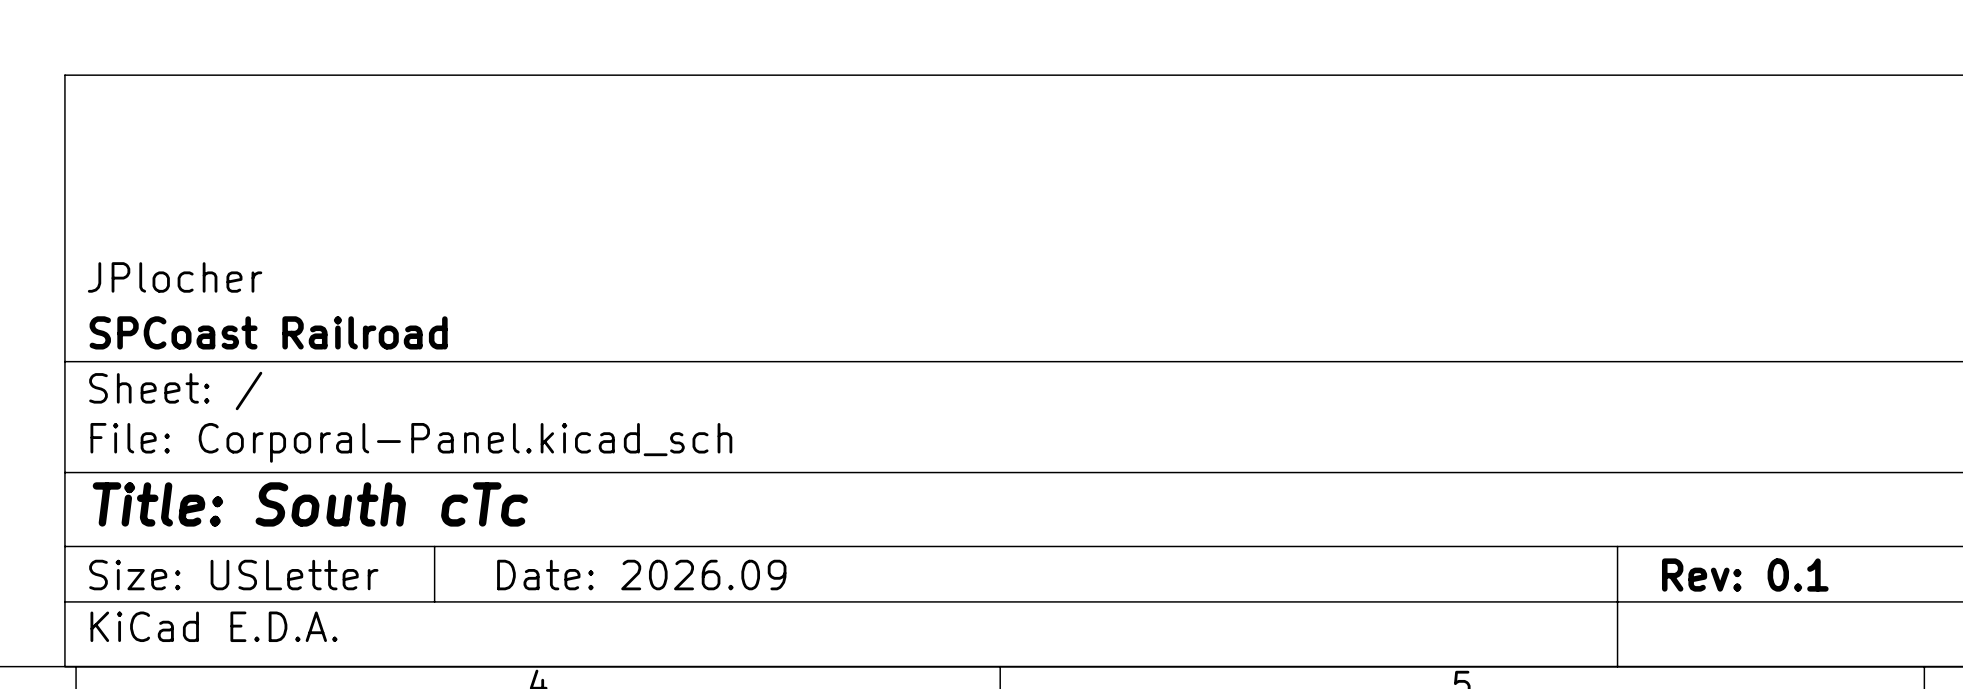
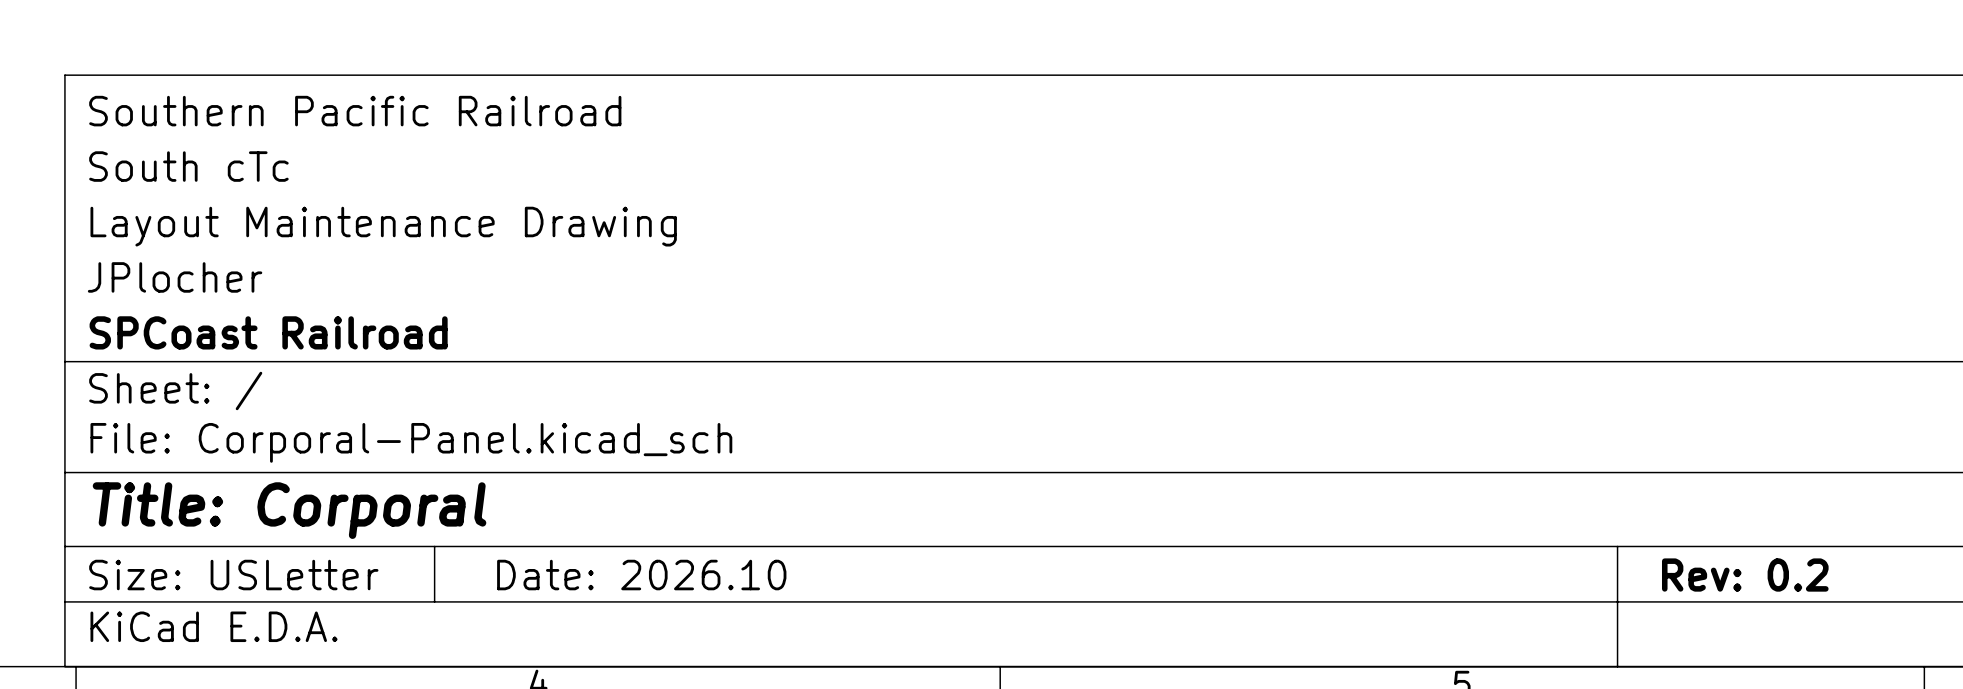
title block: none -> Southern Pacific Railroad (355, 111)
title block: none -> South cTc (188, 166)
title block: none -> Layout Maintenance Drawing (383, 226)
title block: Title: South cTc (310, 504) -> Title: Corporal (289, 510)
title block: Date: 2026.09 (641, 575) -> Date: 2026.10 (641, 575)
title block: Rev: 0.1 (1745, 575) -> Rev: 0.2 (1745, 575)

